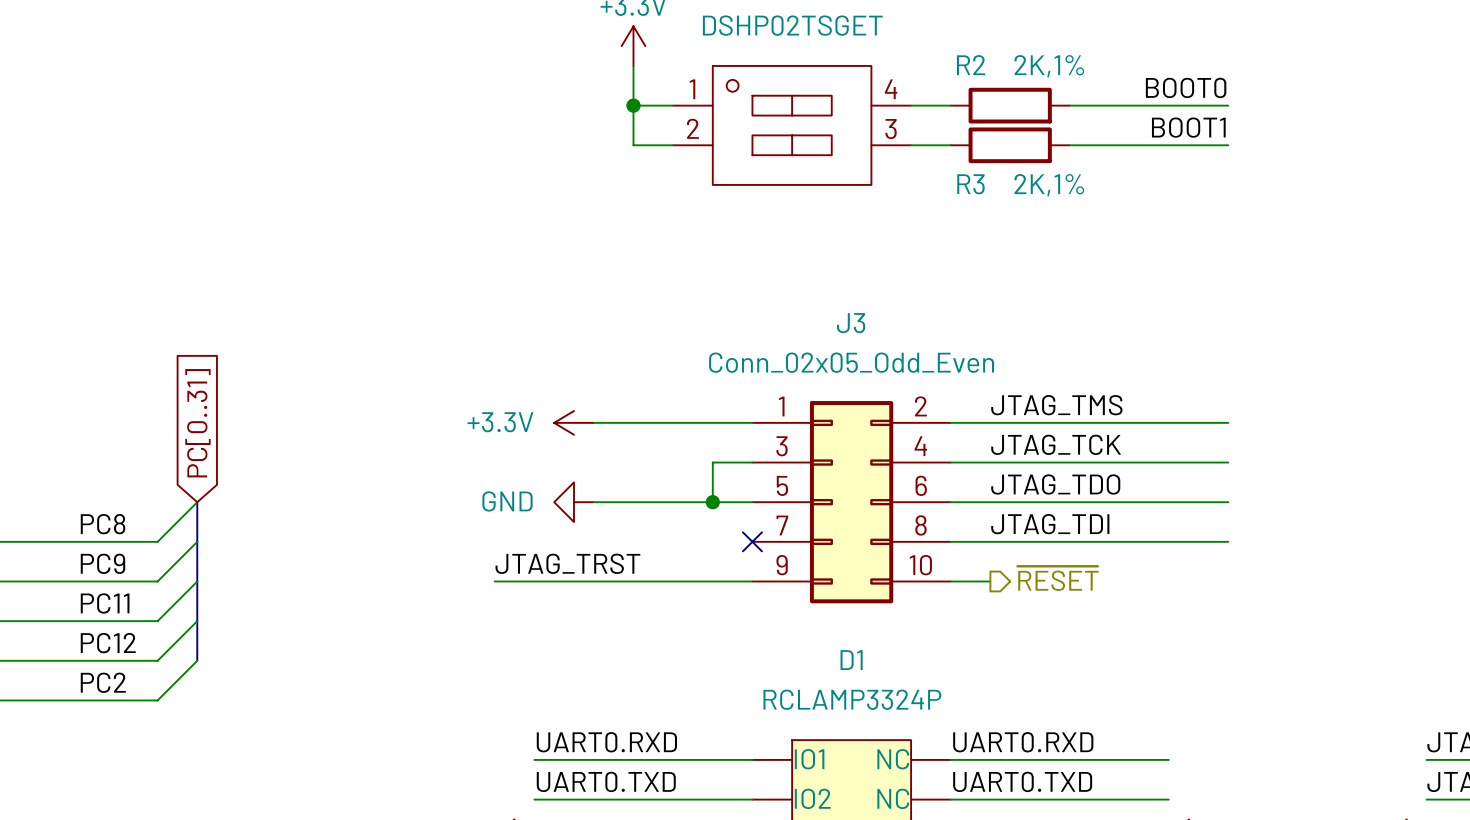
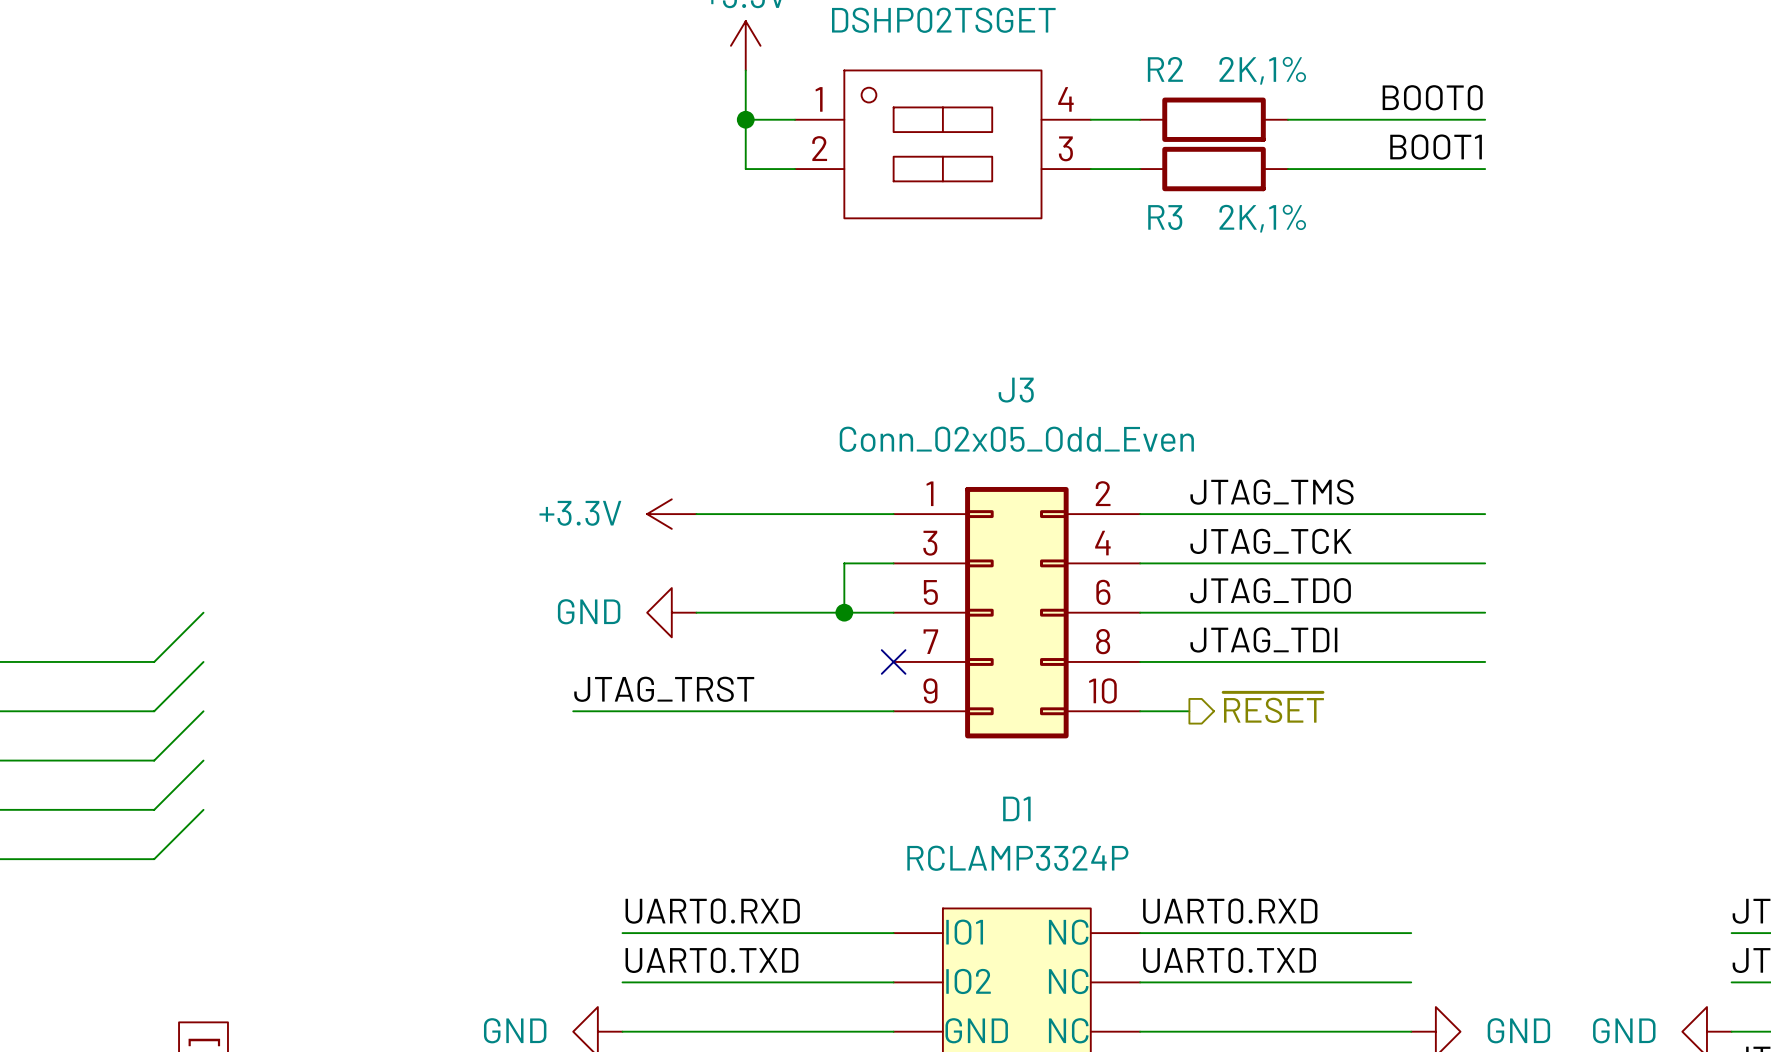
global label: PC[0..31] (197, 423) -> none
bus: (197, 502) (197, 660) -> none
label: PC8 (103, 524) -> none
label: PC9 (102, 563) -> none
label: PC11 (105, 603) -> none
label: PC12 (108, 643) -> none
label: PC2 (103, 682) -> none

